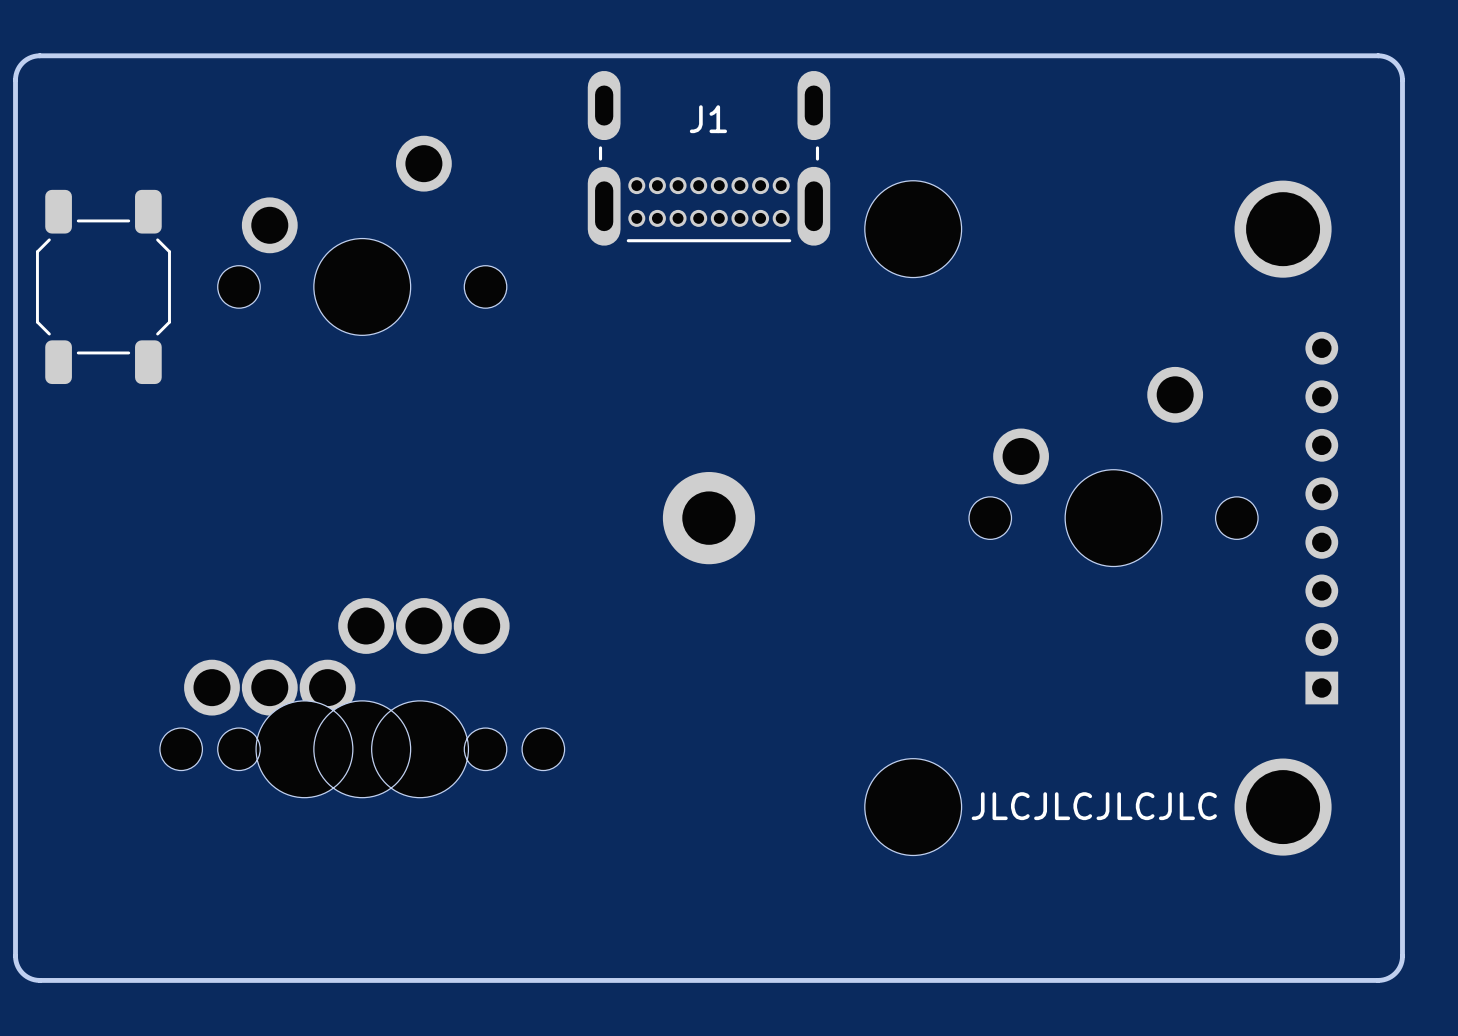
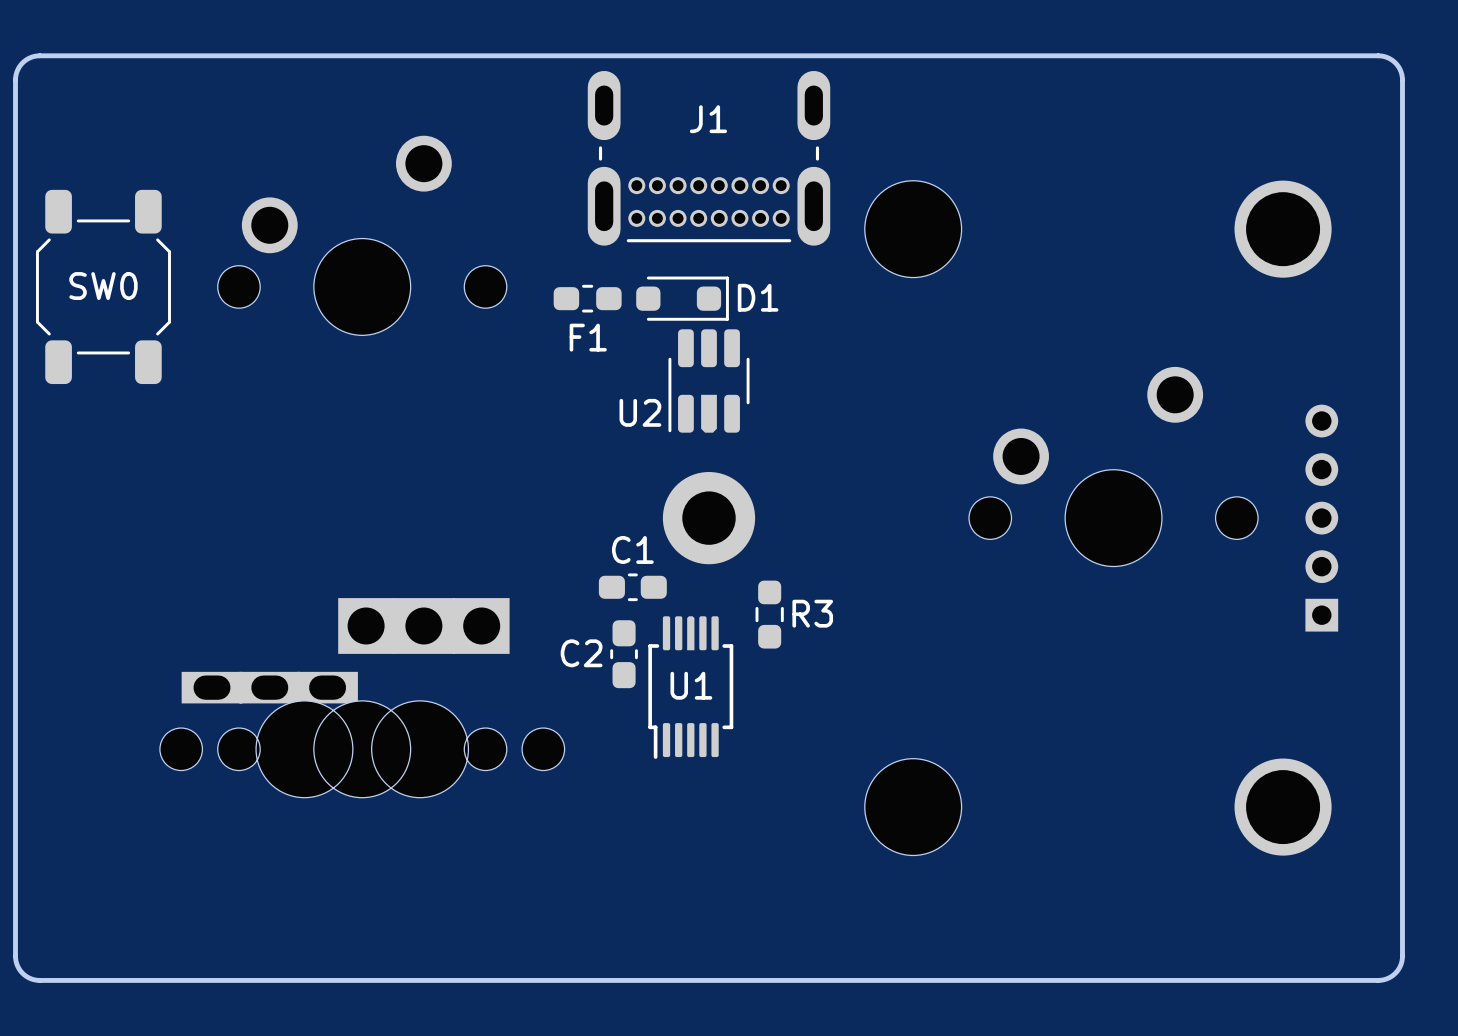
SW0 name: none -> SW0 (103, 286)
F1: none -> (587, 298)
D1: none -> (682, 298)
part footprint: [1305, 331, 1339, 705] -> [1305, 404, 1339, 632]
U2: none -> (709, 380)
C1: none -> (632, 587)
part footprint: [159, 598, 395, 798] -> [159, 598, 395, 798]
part footprint: [217, 598, 507, 798] -> [217, 598, 507, 798]
part footprint: [299, 598, 565, 798] -> [297, 598, 565, 798]
R3: none -> (769, 614)
C2: none -> (624, 654)
U1: none -> (690, 687)
text: JLCJLCJLCJLC (1094, 806) -> none

